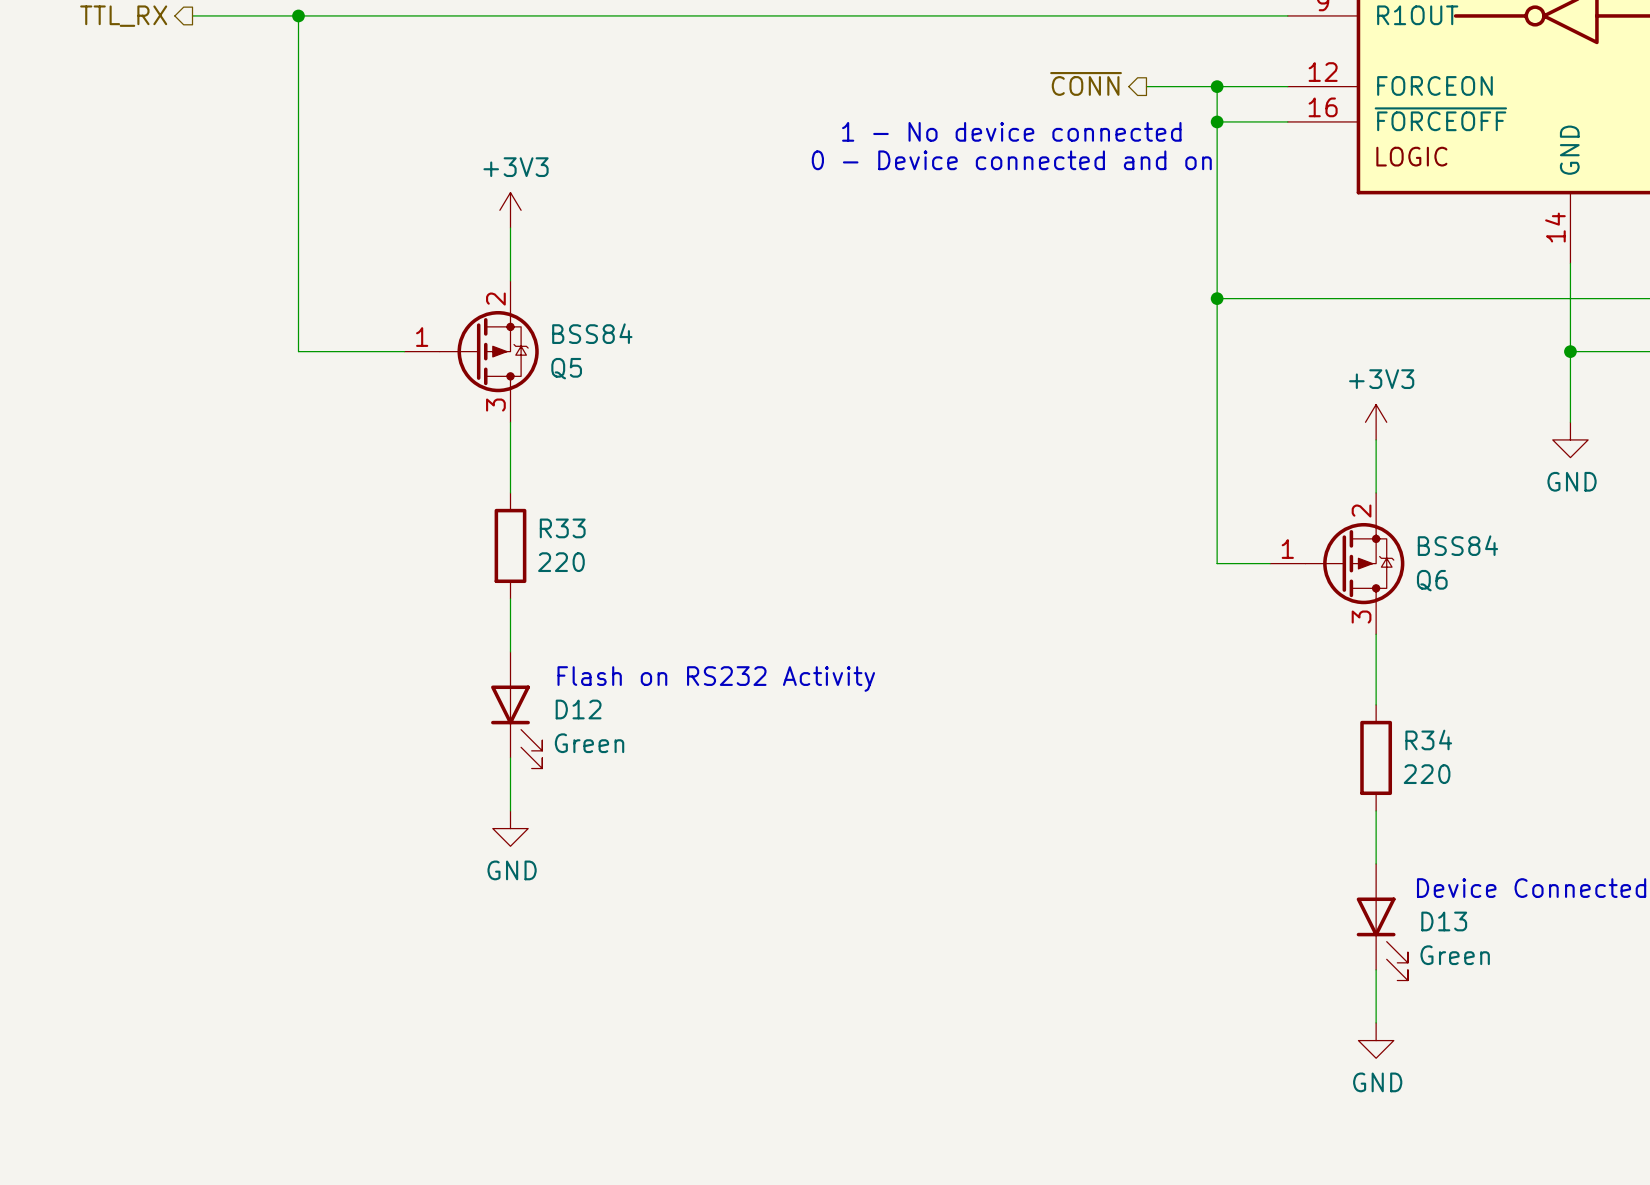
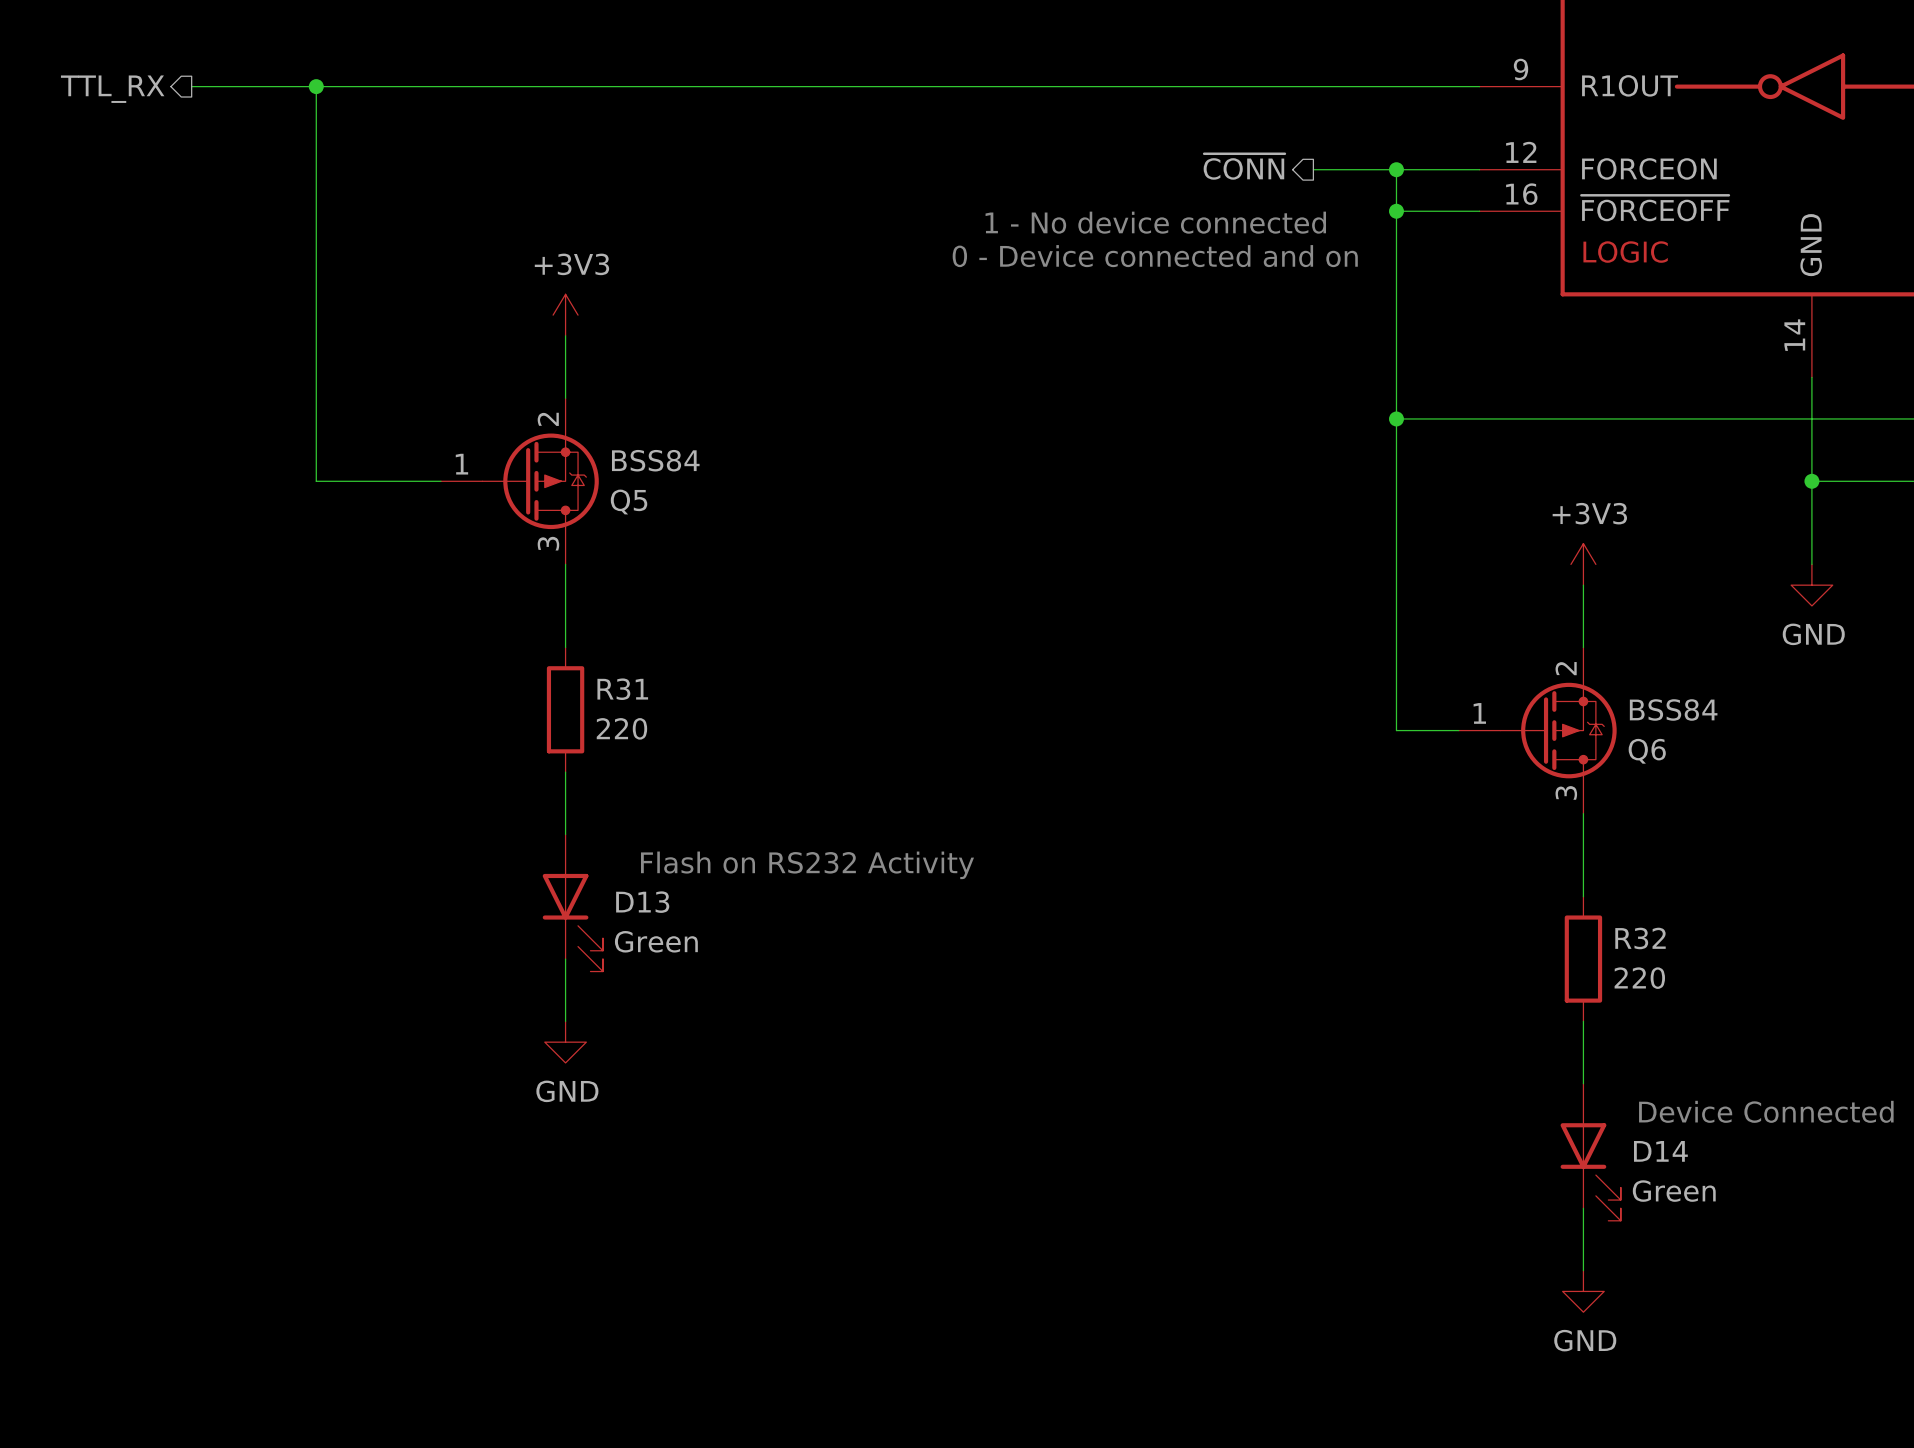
R33 name: R33 (562, 528) -> R31 (622, 689)
D12 name: D12 (578, 709) -> D13 (642, 902)
R34 name: R34 (1428, 739) -> R32 (1640, 938)
D13 name: D13 (1444, 921) -> D14 (1660, 1151)

